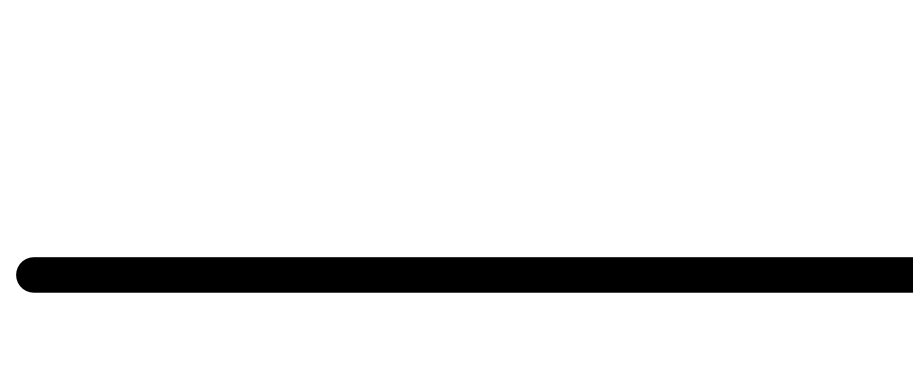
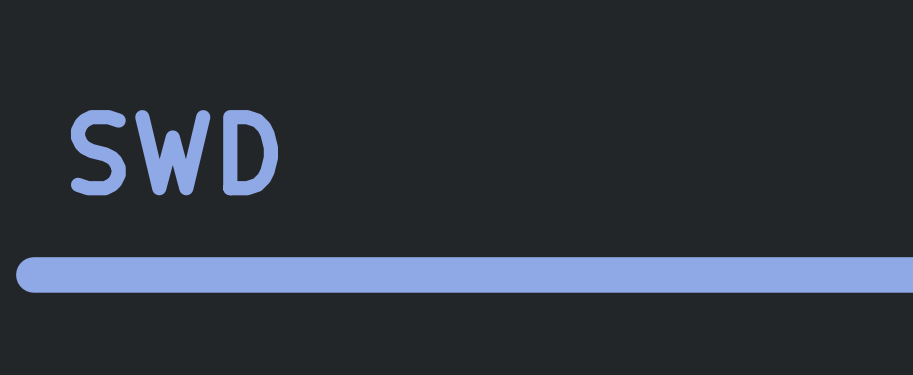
text: none -> SWD (174, 152)

